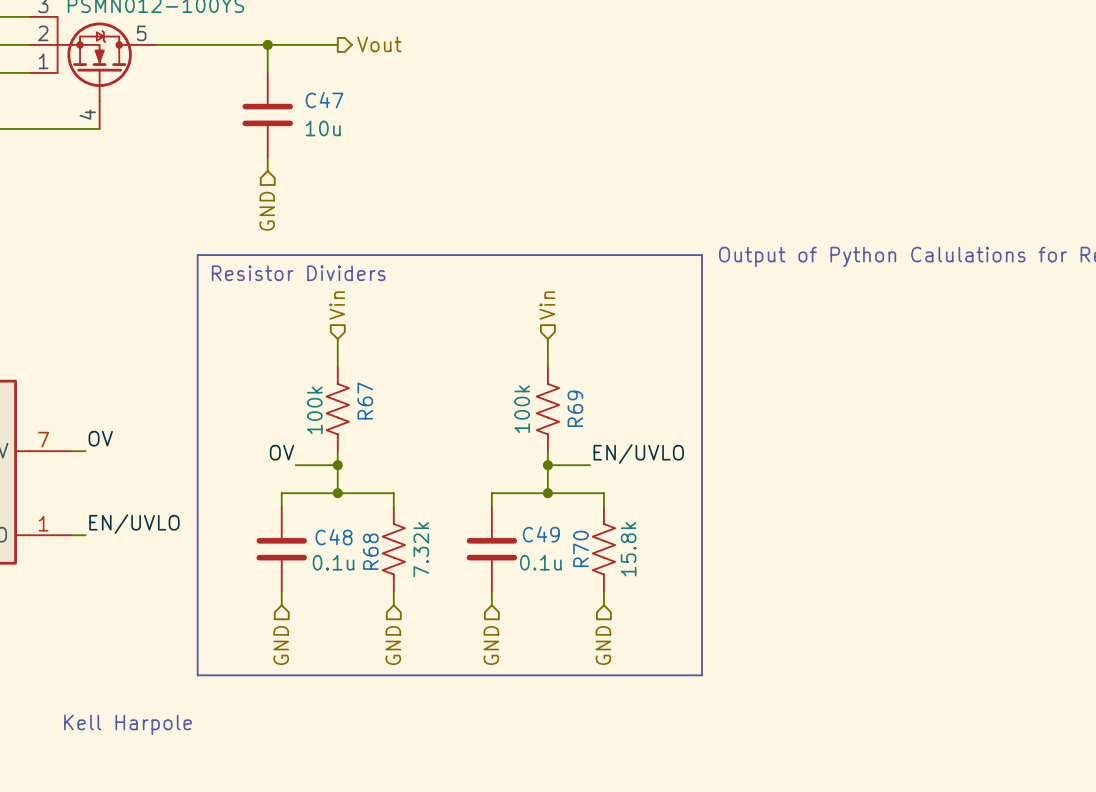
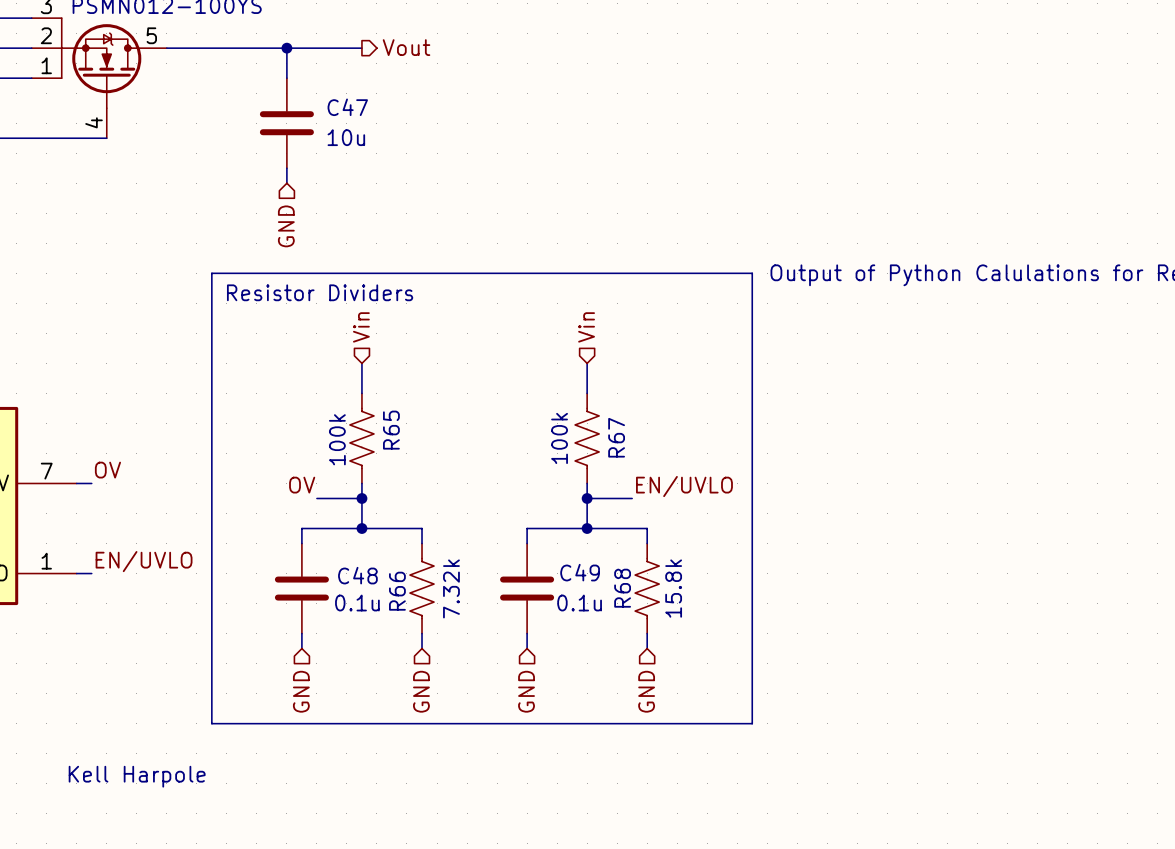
R67 name: R67 (365, 401) -> R65 (391, 430)
R69 name: R69 (575, 408) -> R67 (616, 437)
R70 name: R70 (581, 548) -> R68 (622, 588)
R68 name: R68 (370, 551) -> R66 (397, 591)

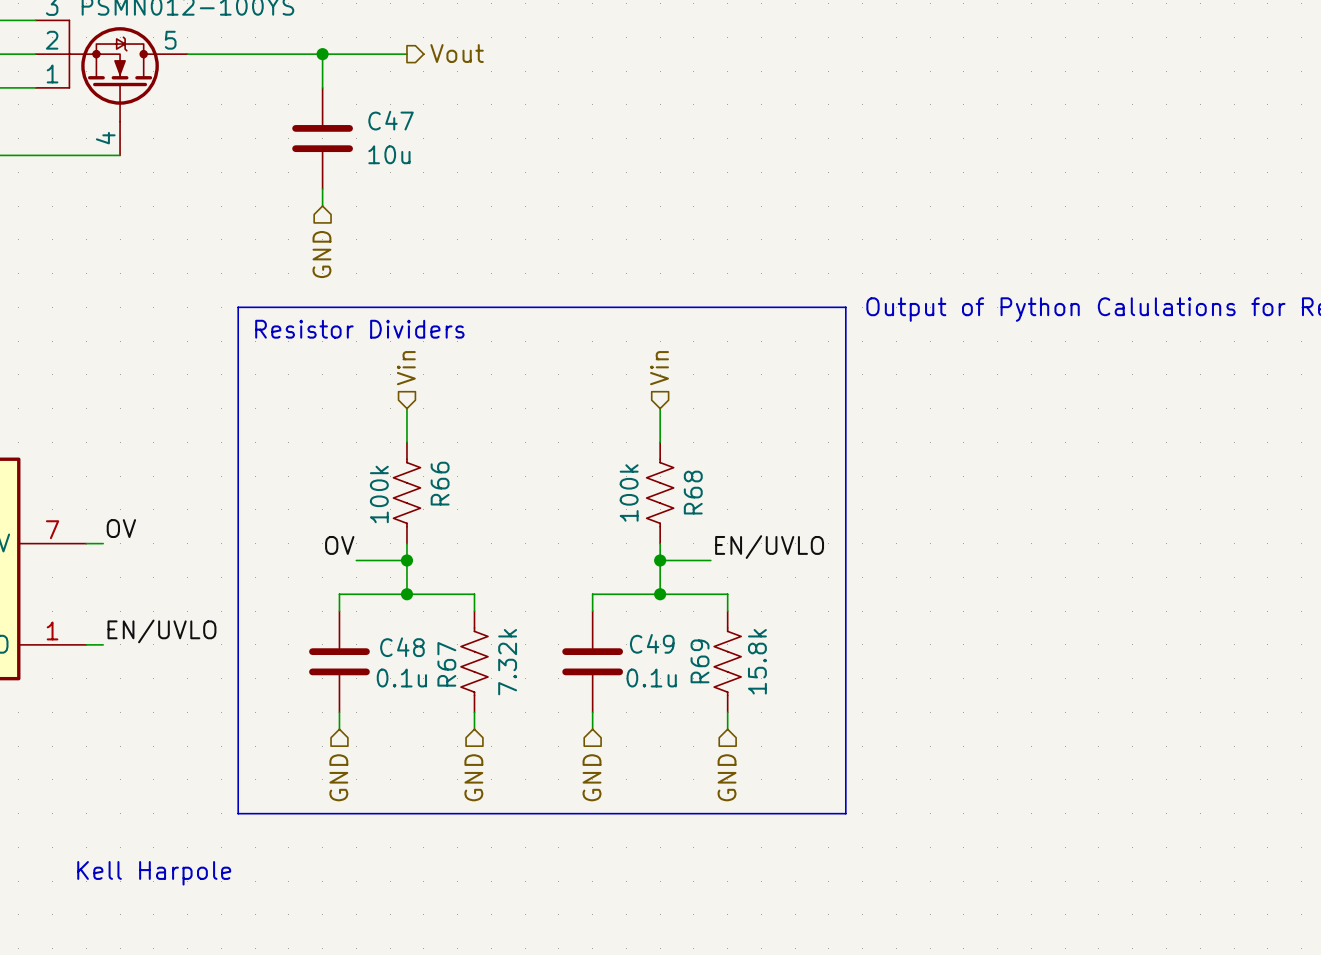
R65 name: R65 (391, 430) -> R66 (440, 483)
R67 name: R67 (616, 437) -> R68 (693, 492)
R68 name: R68 (622, 588) -> R69 (700, 661)
R66 name: R66 (397, 591) -> R67 (446, 664)

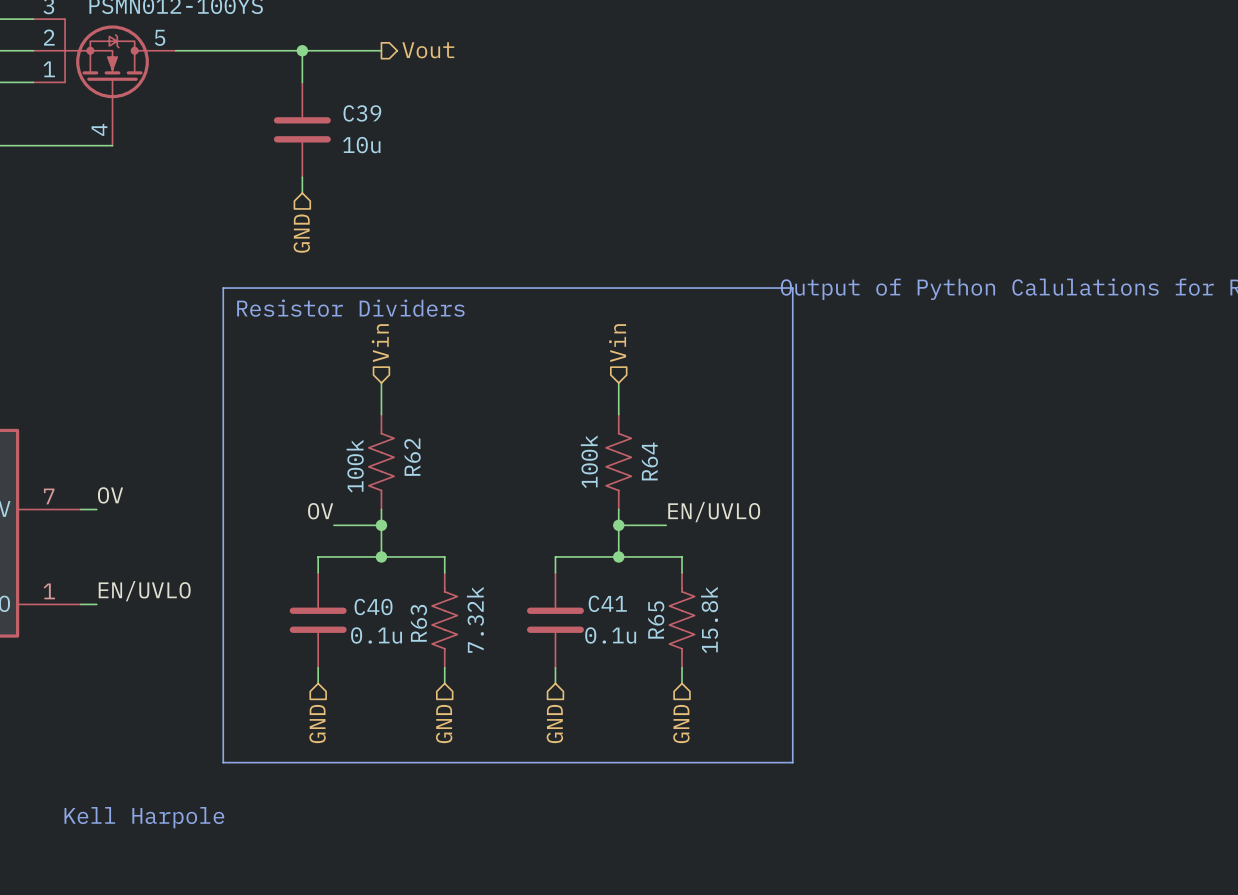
C47 name: C47 (391, 120) -> C39 (362, 113)
R66 name: R66 (440, 483) -> R62 (412, 457)
R68 name: R68 (693, 492) -> R64 (649, 461)
C49 name: C49 (652, 643) -> C41 (607, 603)
C48 name: C48 (402, 647) -> C40 (373, 607)
R69 name: R69 (700, 661) -> R65 (656, 619)
R67 name: R67 (446, 664) -> R63 (418, 623)

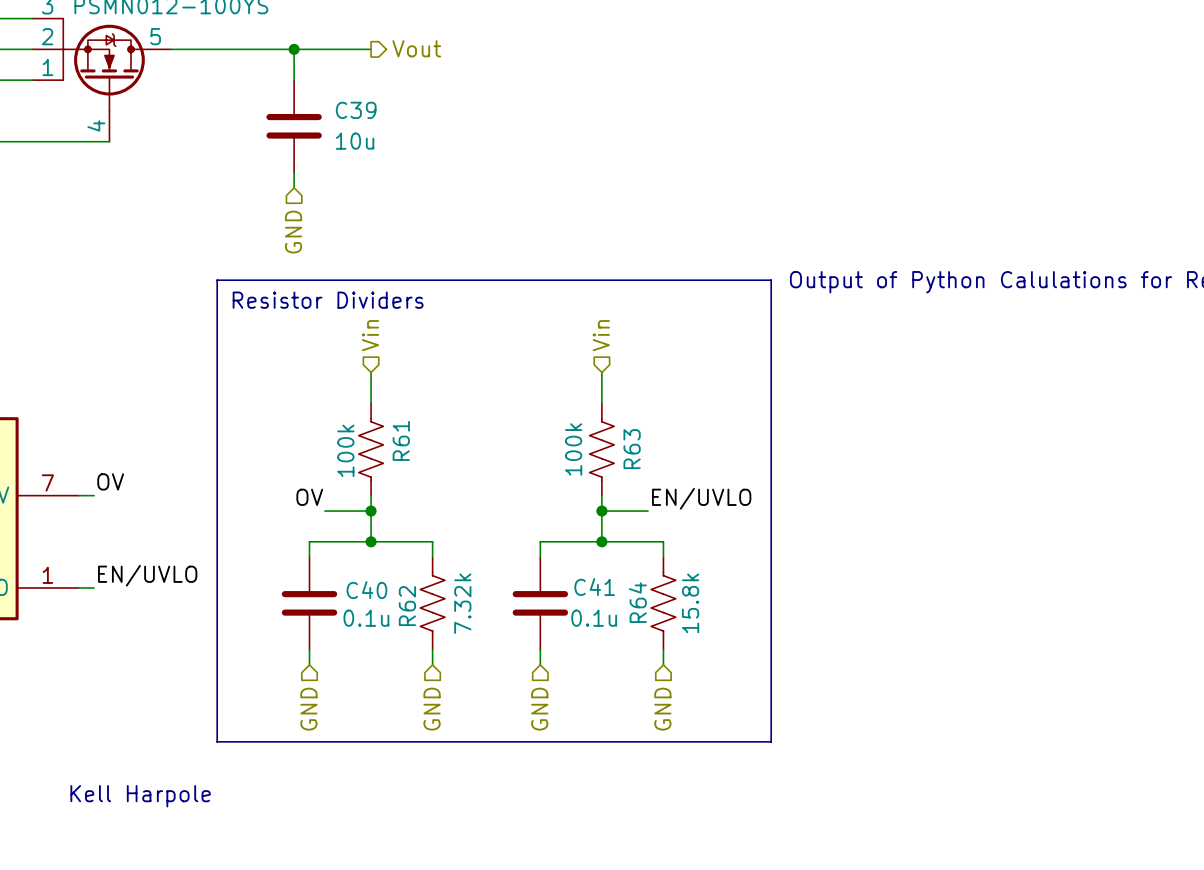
R62 name: R62 (412, 457) -> R61 (401, 440)
R64 name: R64 (649, 461) -> R63 (632, 449)
R65 name: R65 (656, 619) -> R64 (637, 602)
R63 name: R63 (418, 623) -> R62 (407, 606)

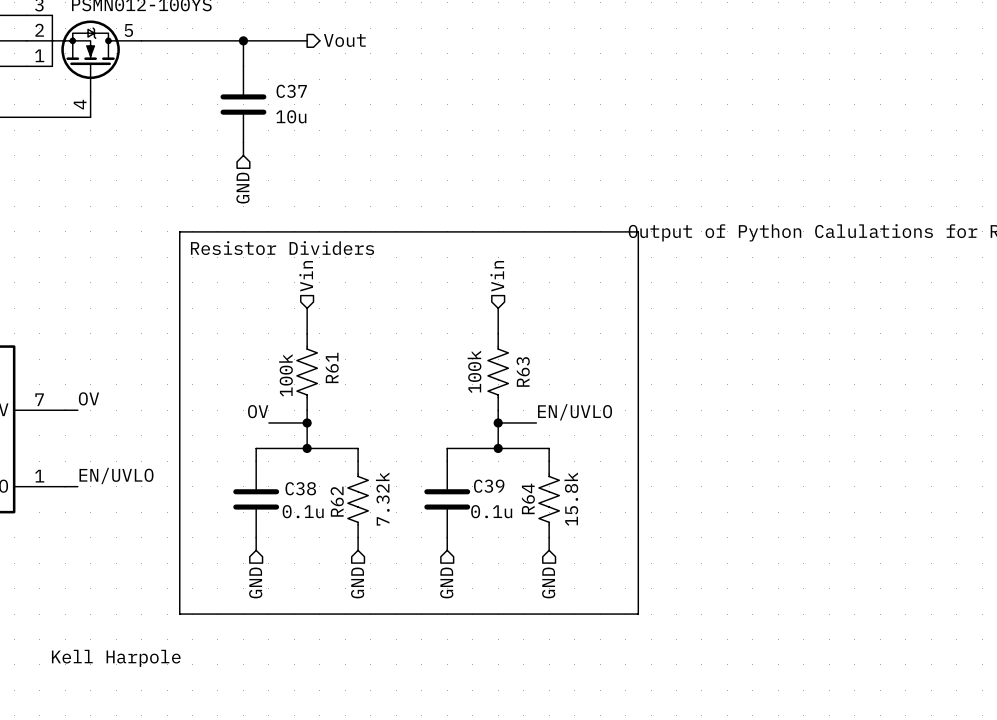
C39 name: C39 (356, 110) -> C37 (291, 91)
C41 name: C41 (594, 587) -> C39 (489, 486)
C40 name: C40 (366, 590) -> C38 (300, 488)

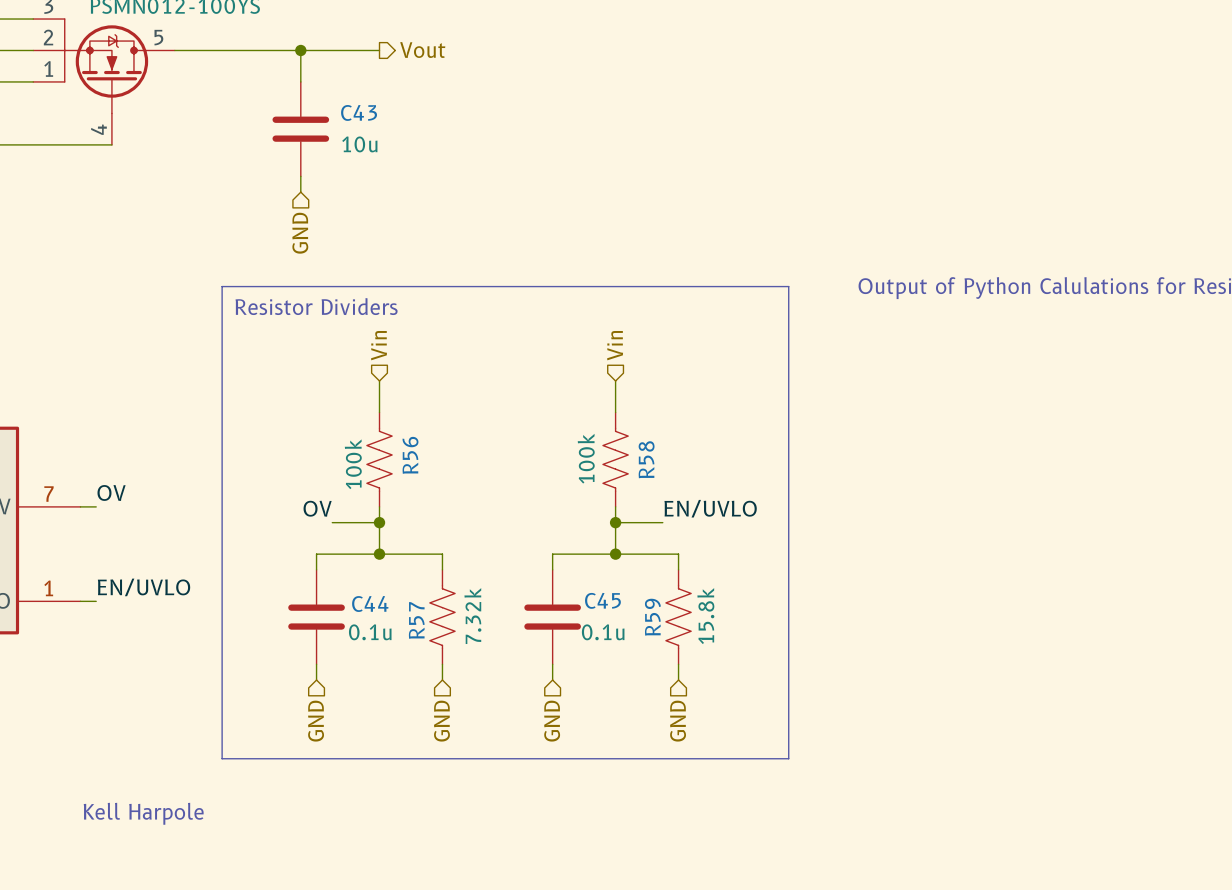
C37 name: C37 (291, 91) -> C43 (359, 112)
R61 name: R61 (332, 367) -> R56 (410, 455)
R63 name: R63 (523, 371) -> R58 (646, 459)
C39 name: C39 (489, 486) -> C45 (602, 600)
C38 name: C38 (300, 488) -> C44 (370, 604)
R64 name: R64 (528, 498) -> R59 (652, 617)
R62 name: R62 (337, 501) -> R57 (416, 620)

